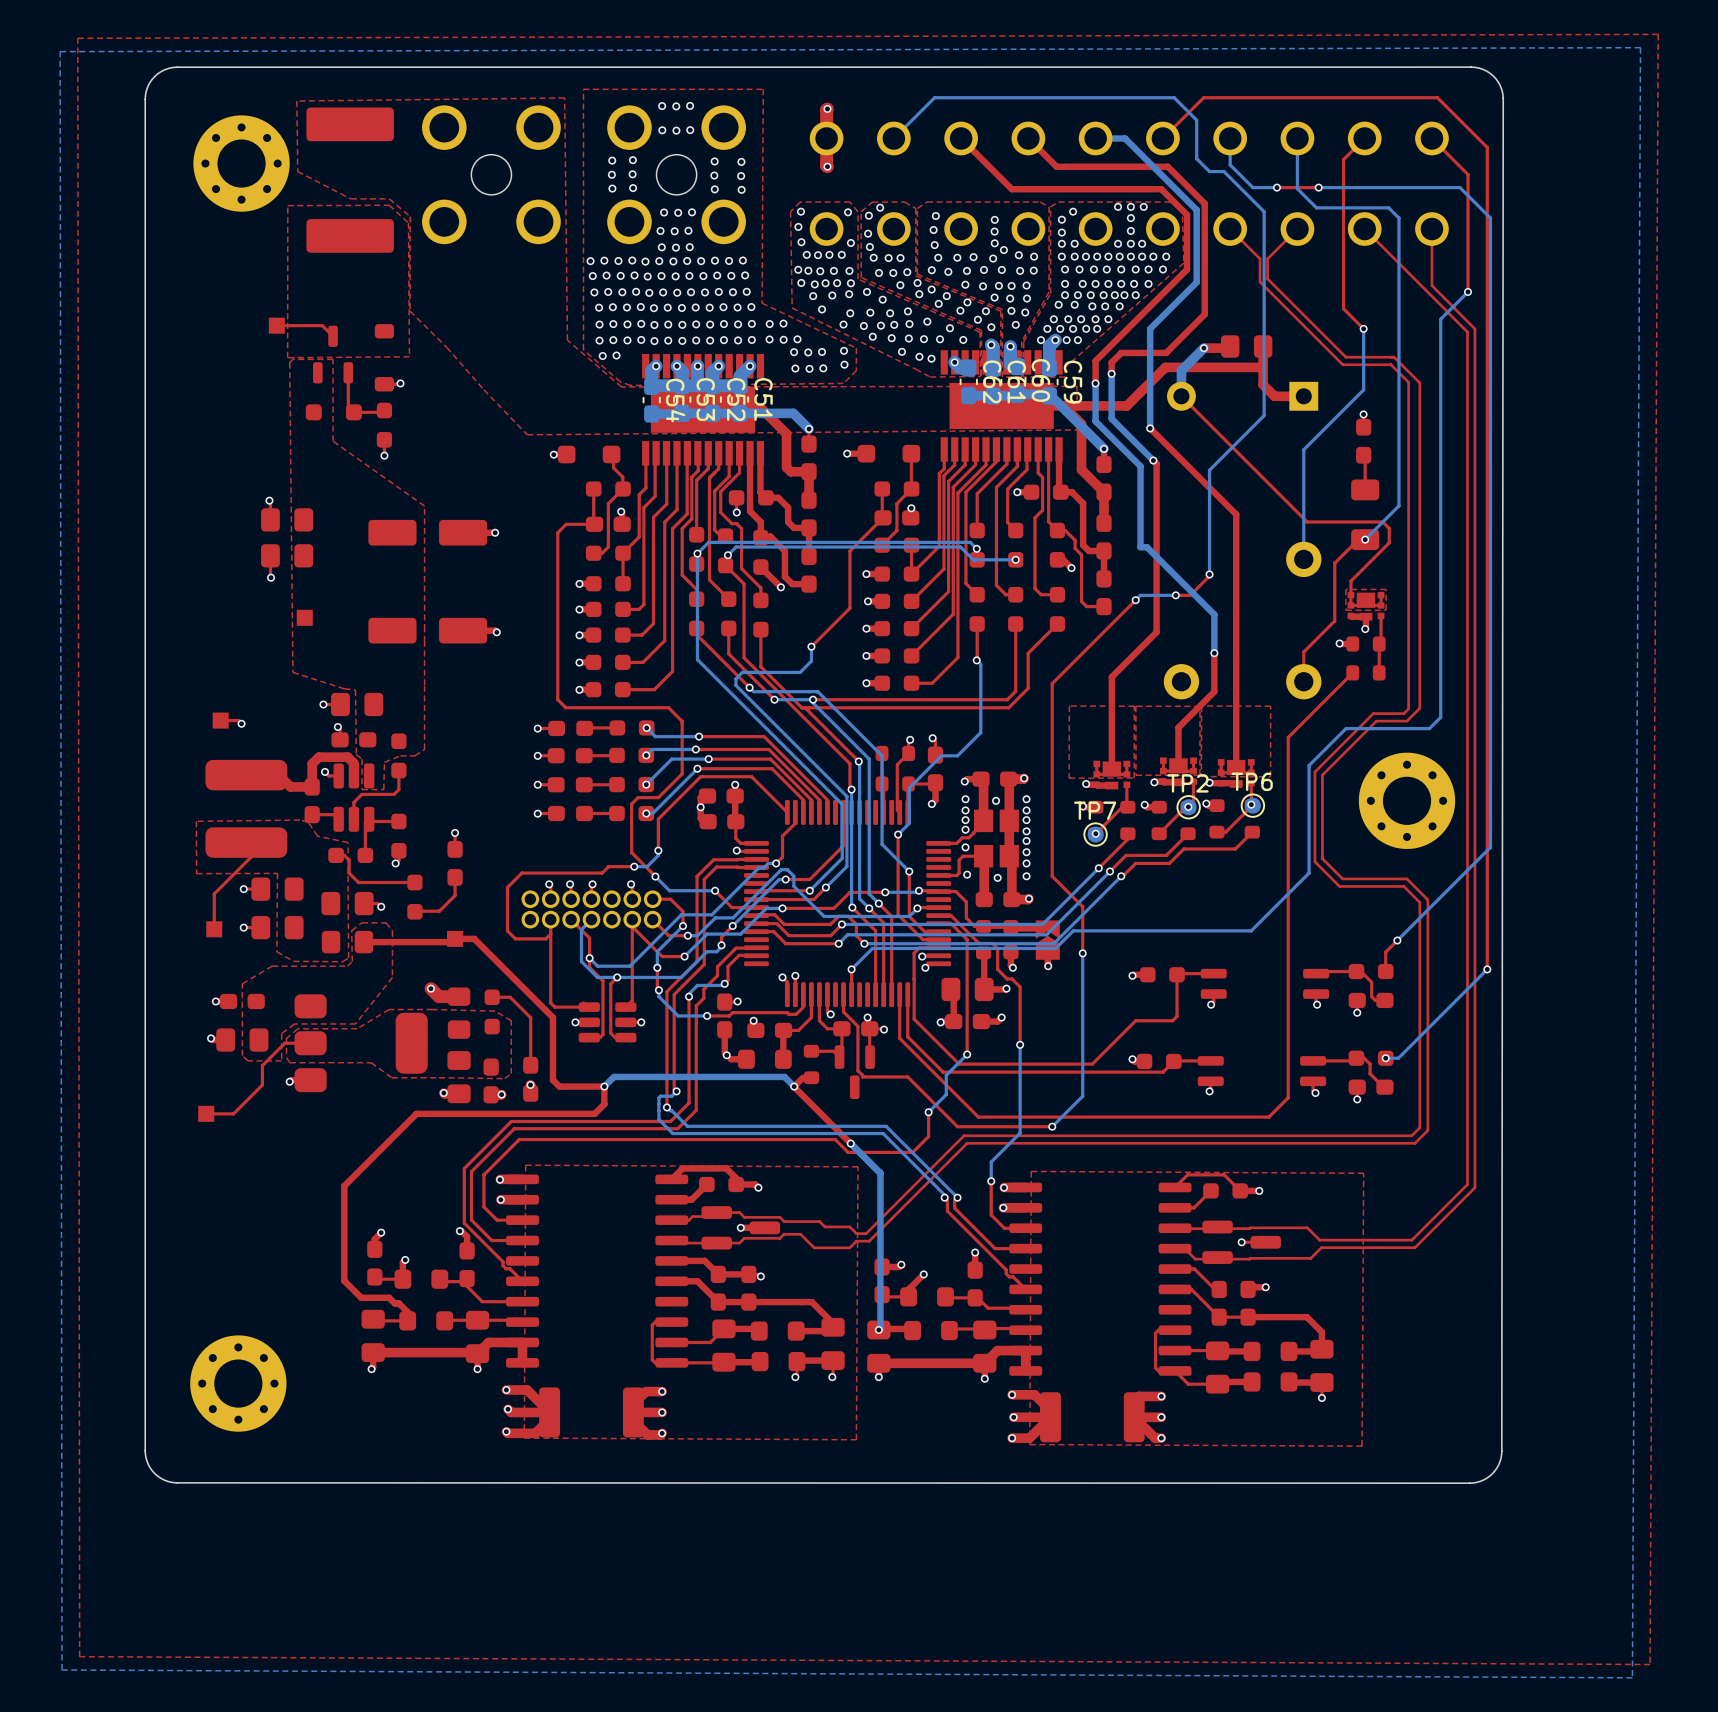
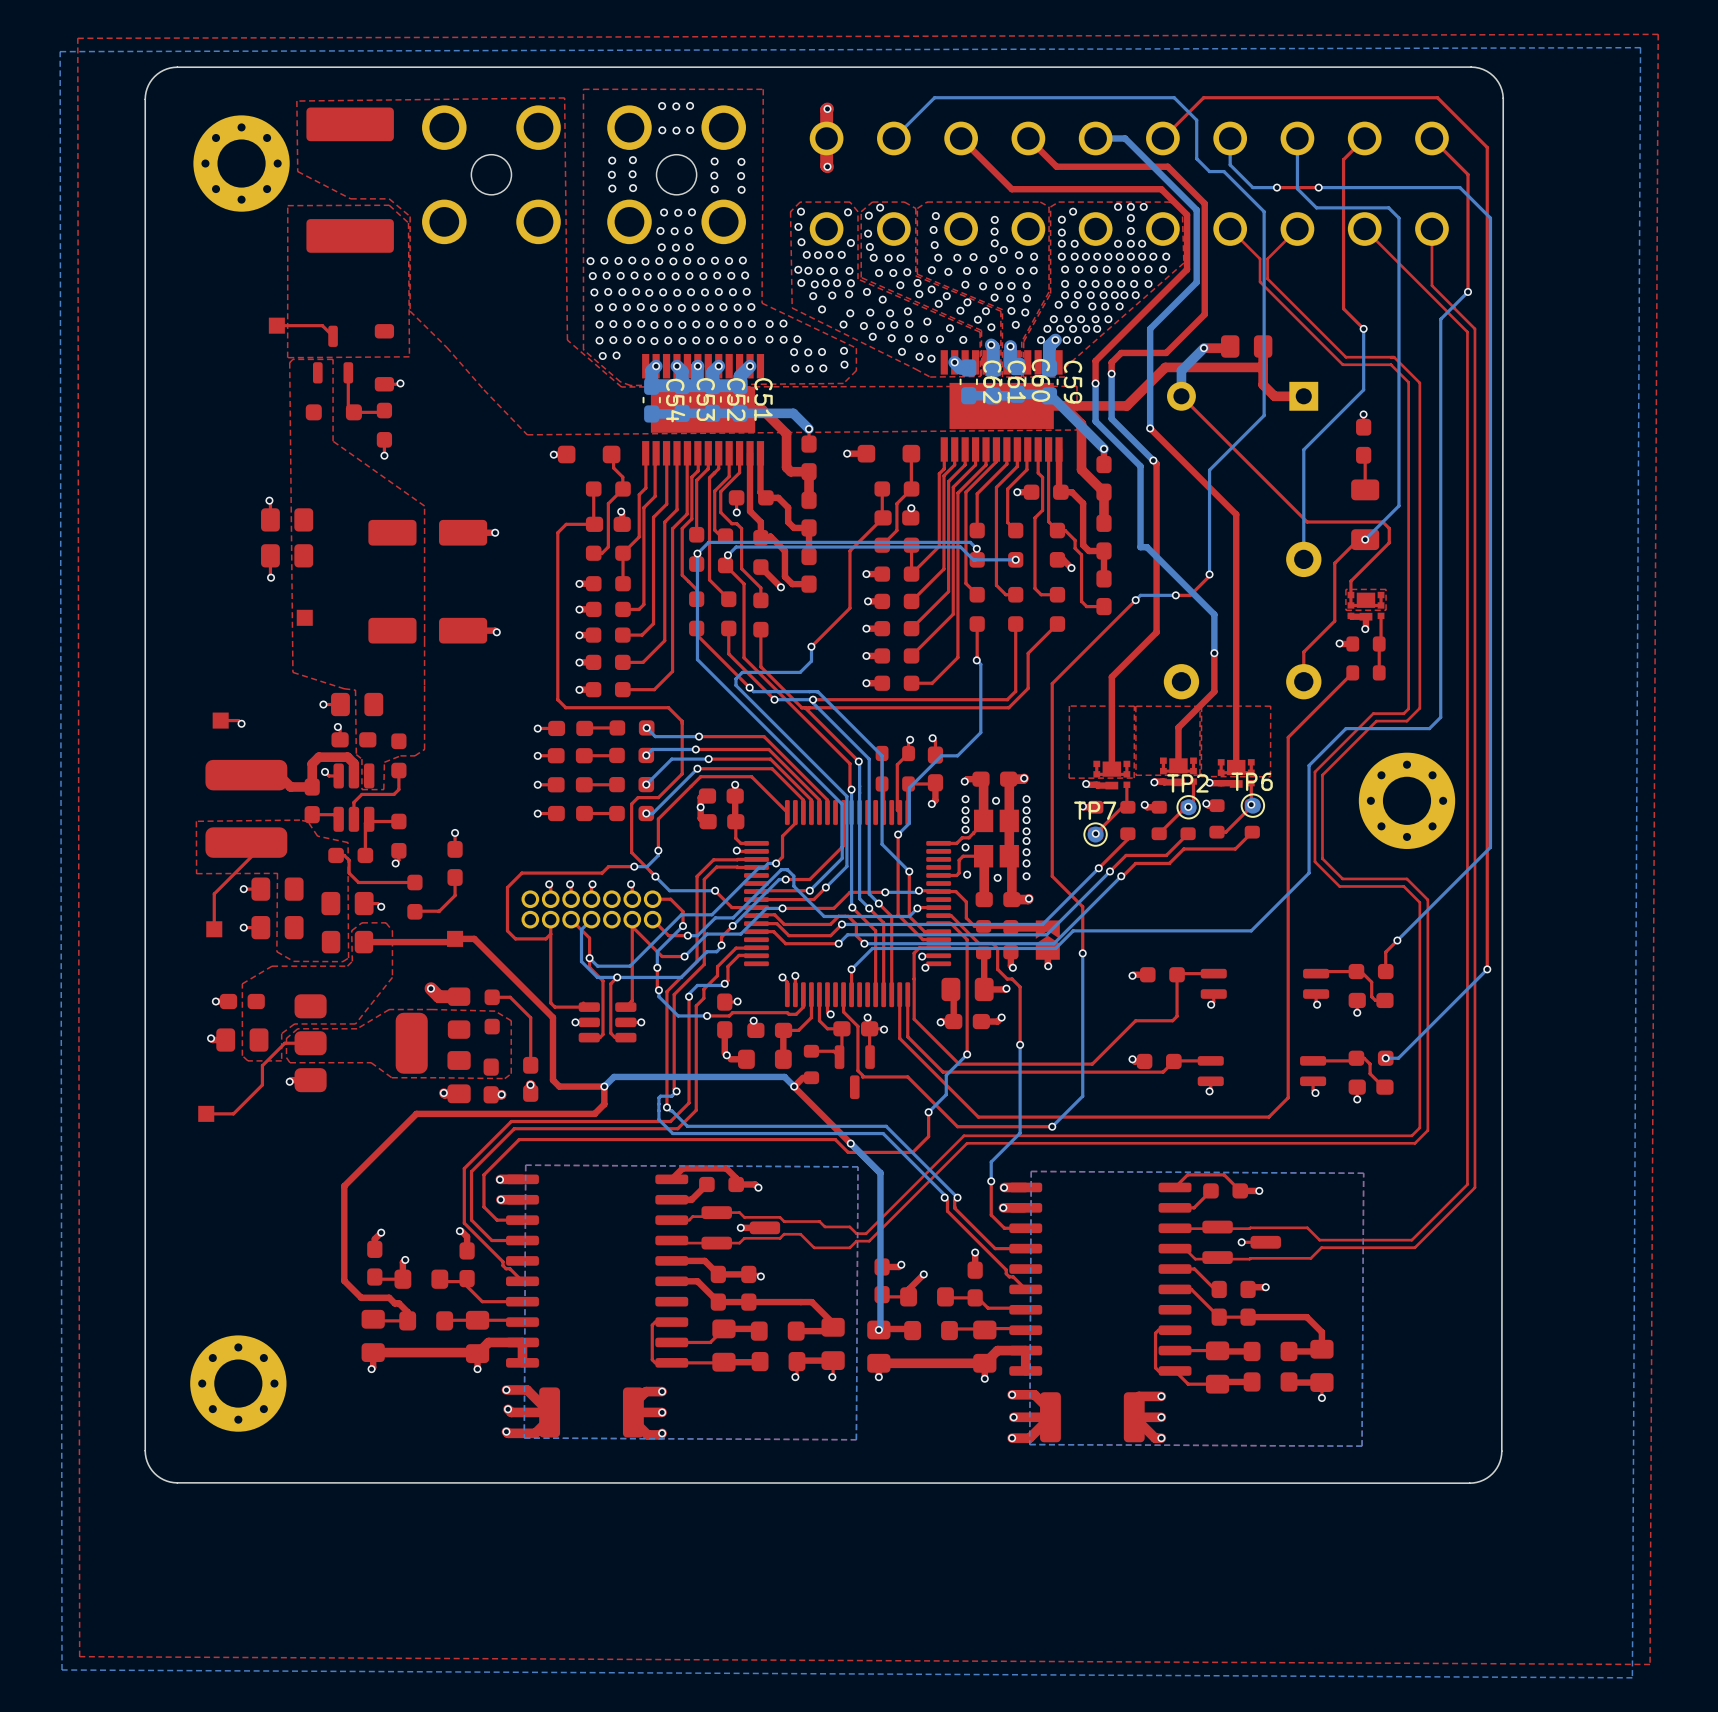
bottom zone outline: none -> (525, 1165) (524, 1438) (856, 1439) (857, 1166) (525, 1165)
bottom zone outline: none -> (1031, 1171) (1029, 1444) (1362, 1446) (1363, 1173) (1031, 1171)

